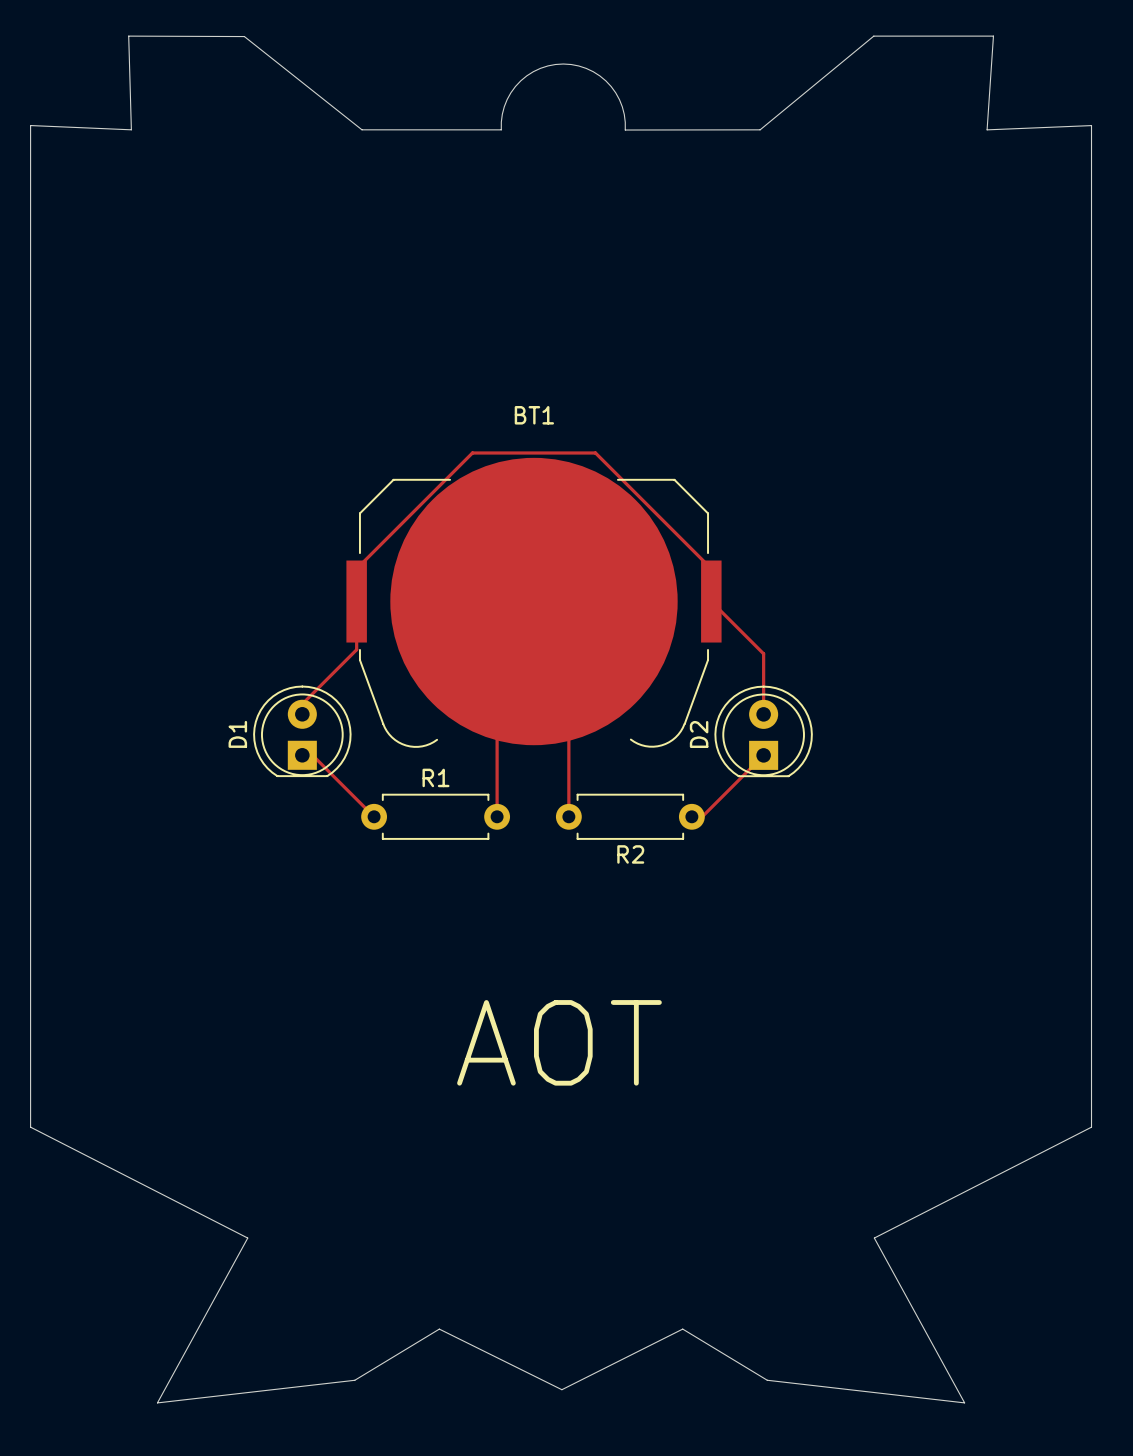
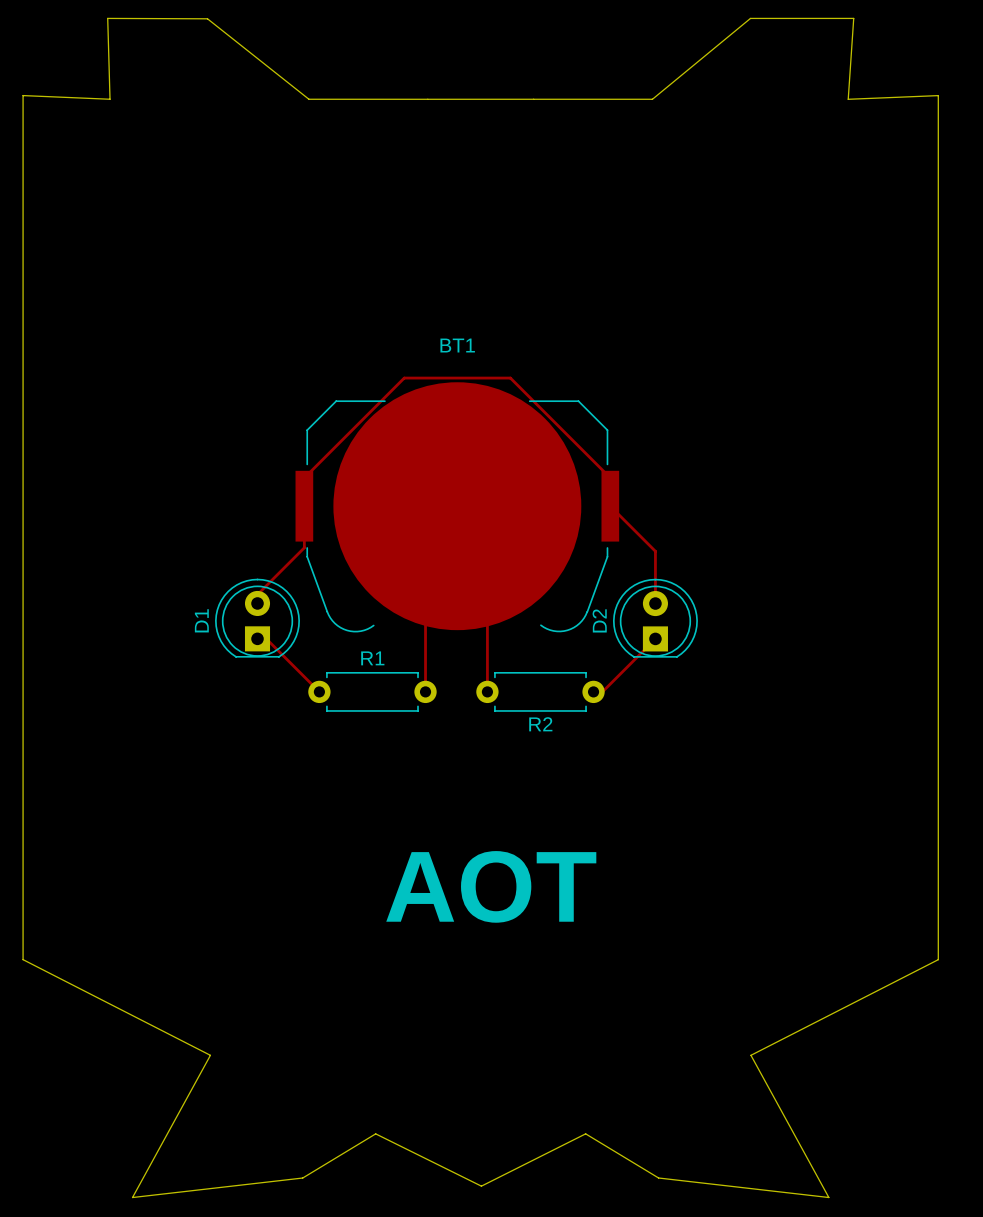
board edge: (499, 129) (507, 99) (520, 80) (540, 68) (563, 64) (586, 68) (605, 80) (619, 99) (624, 114) (625, 130) (760, 129) -> (427, 99) (652, 99)

